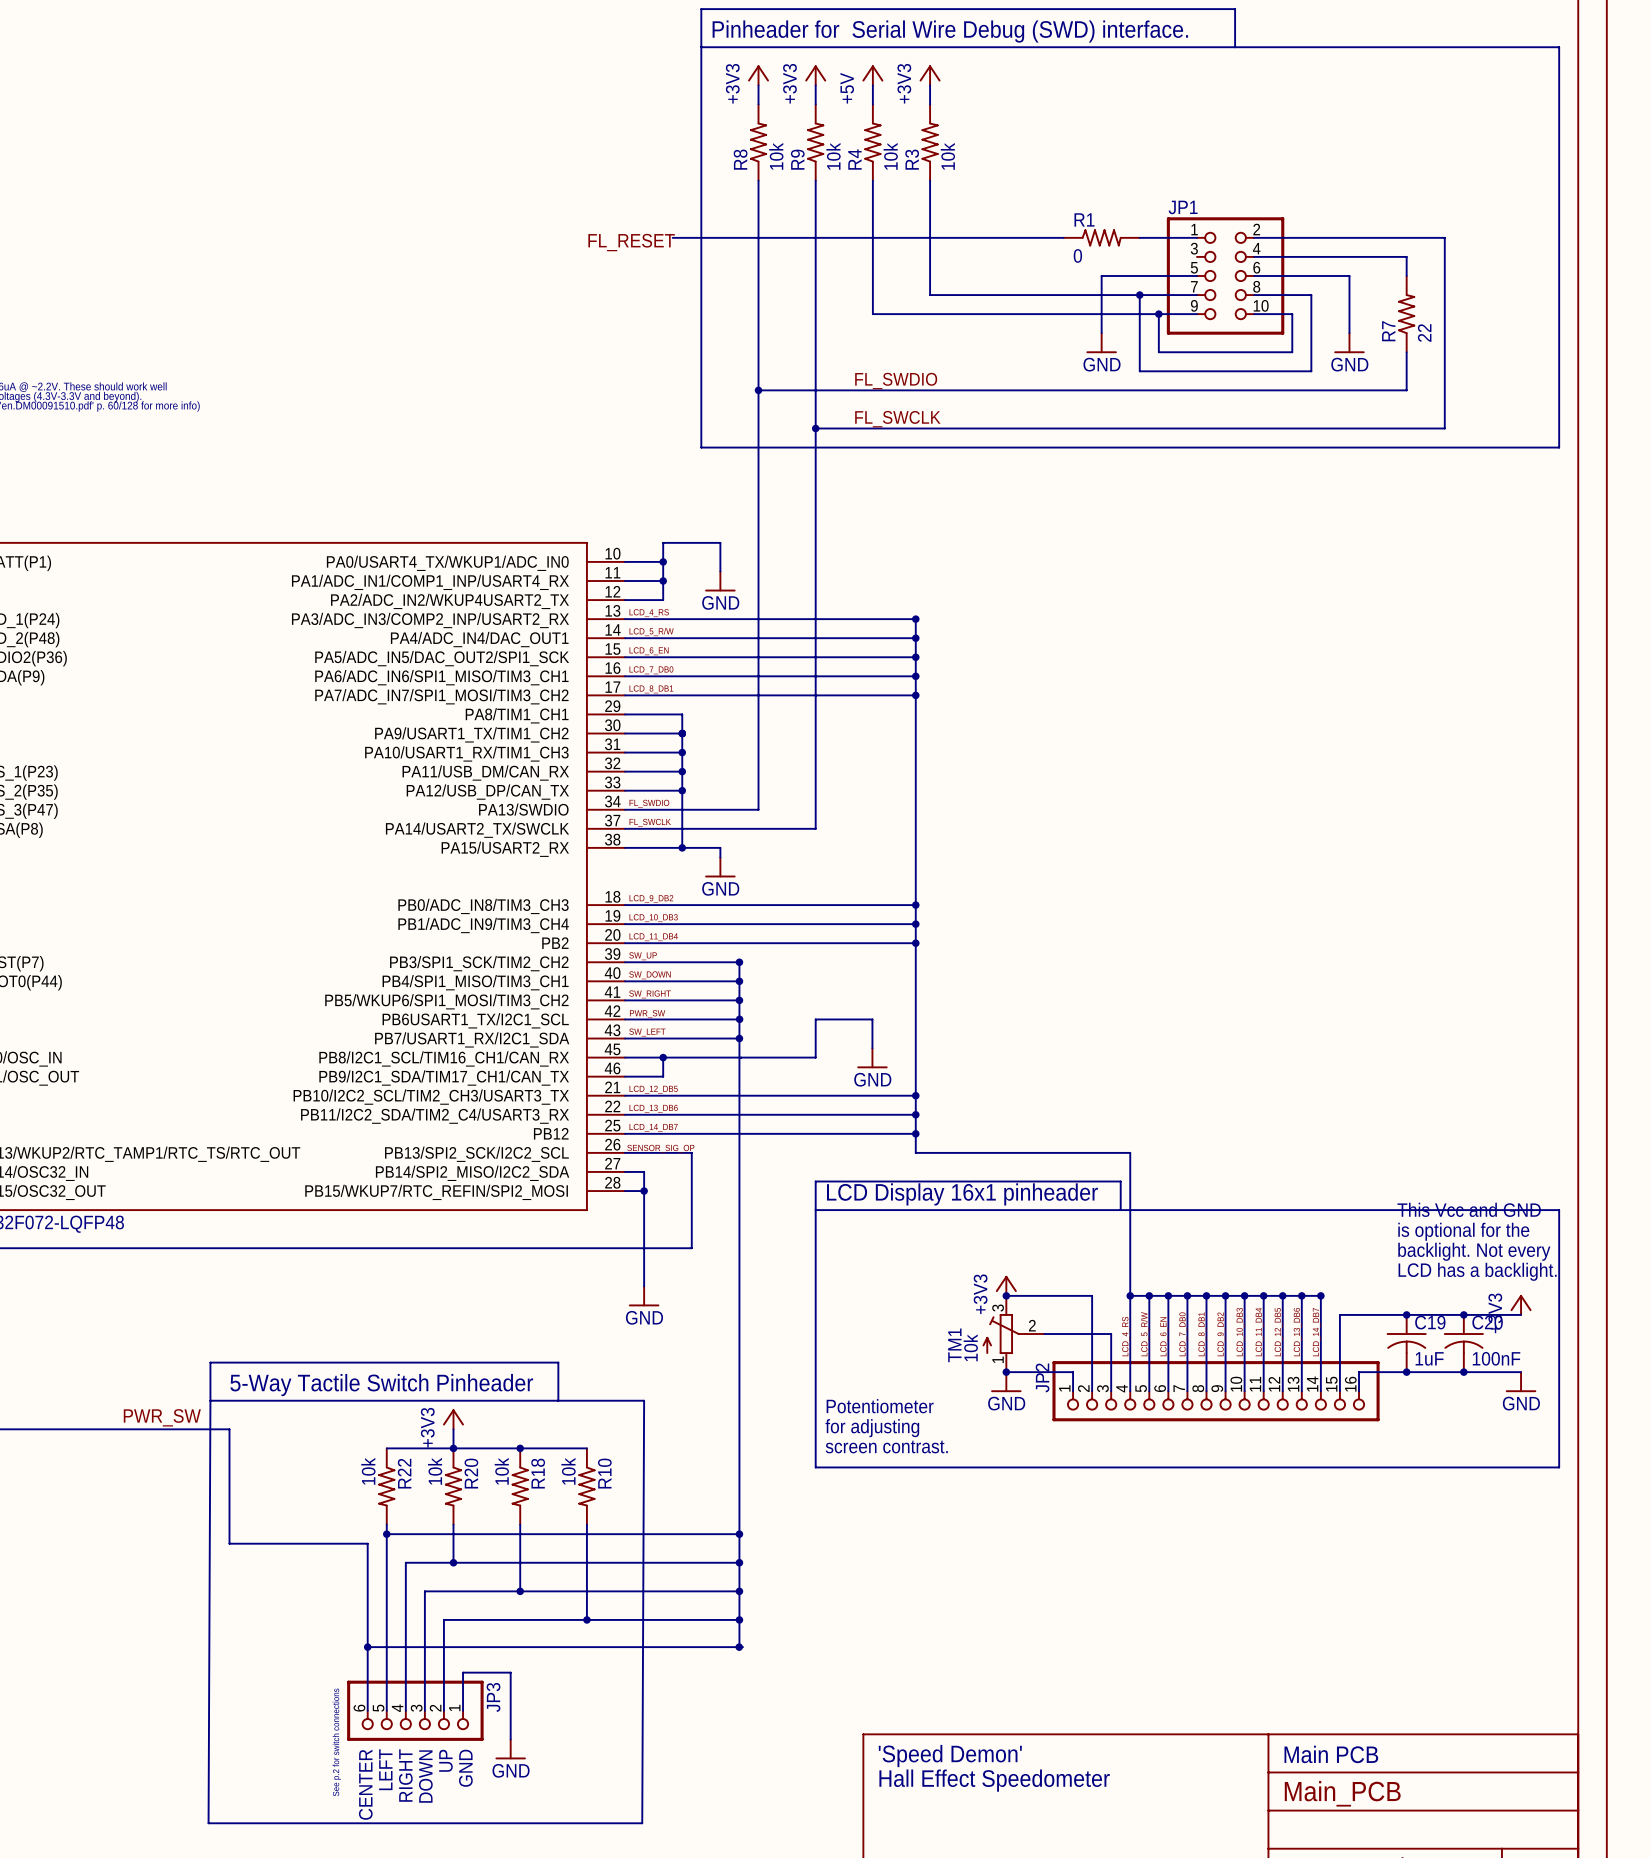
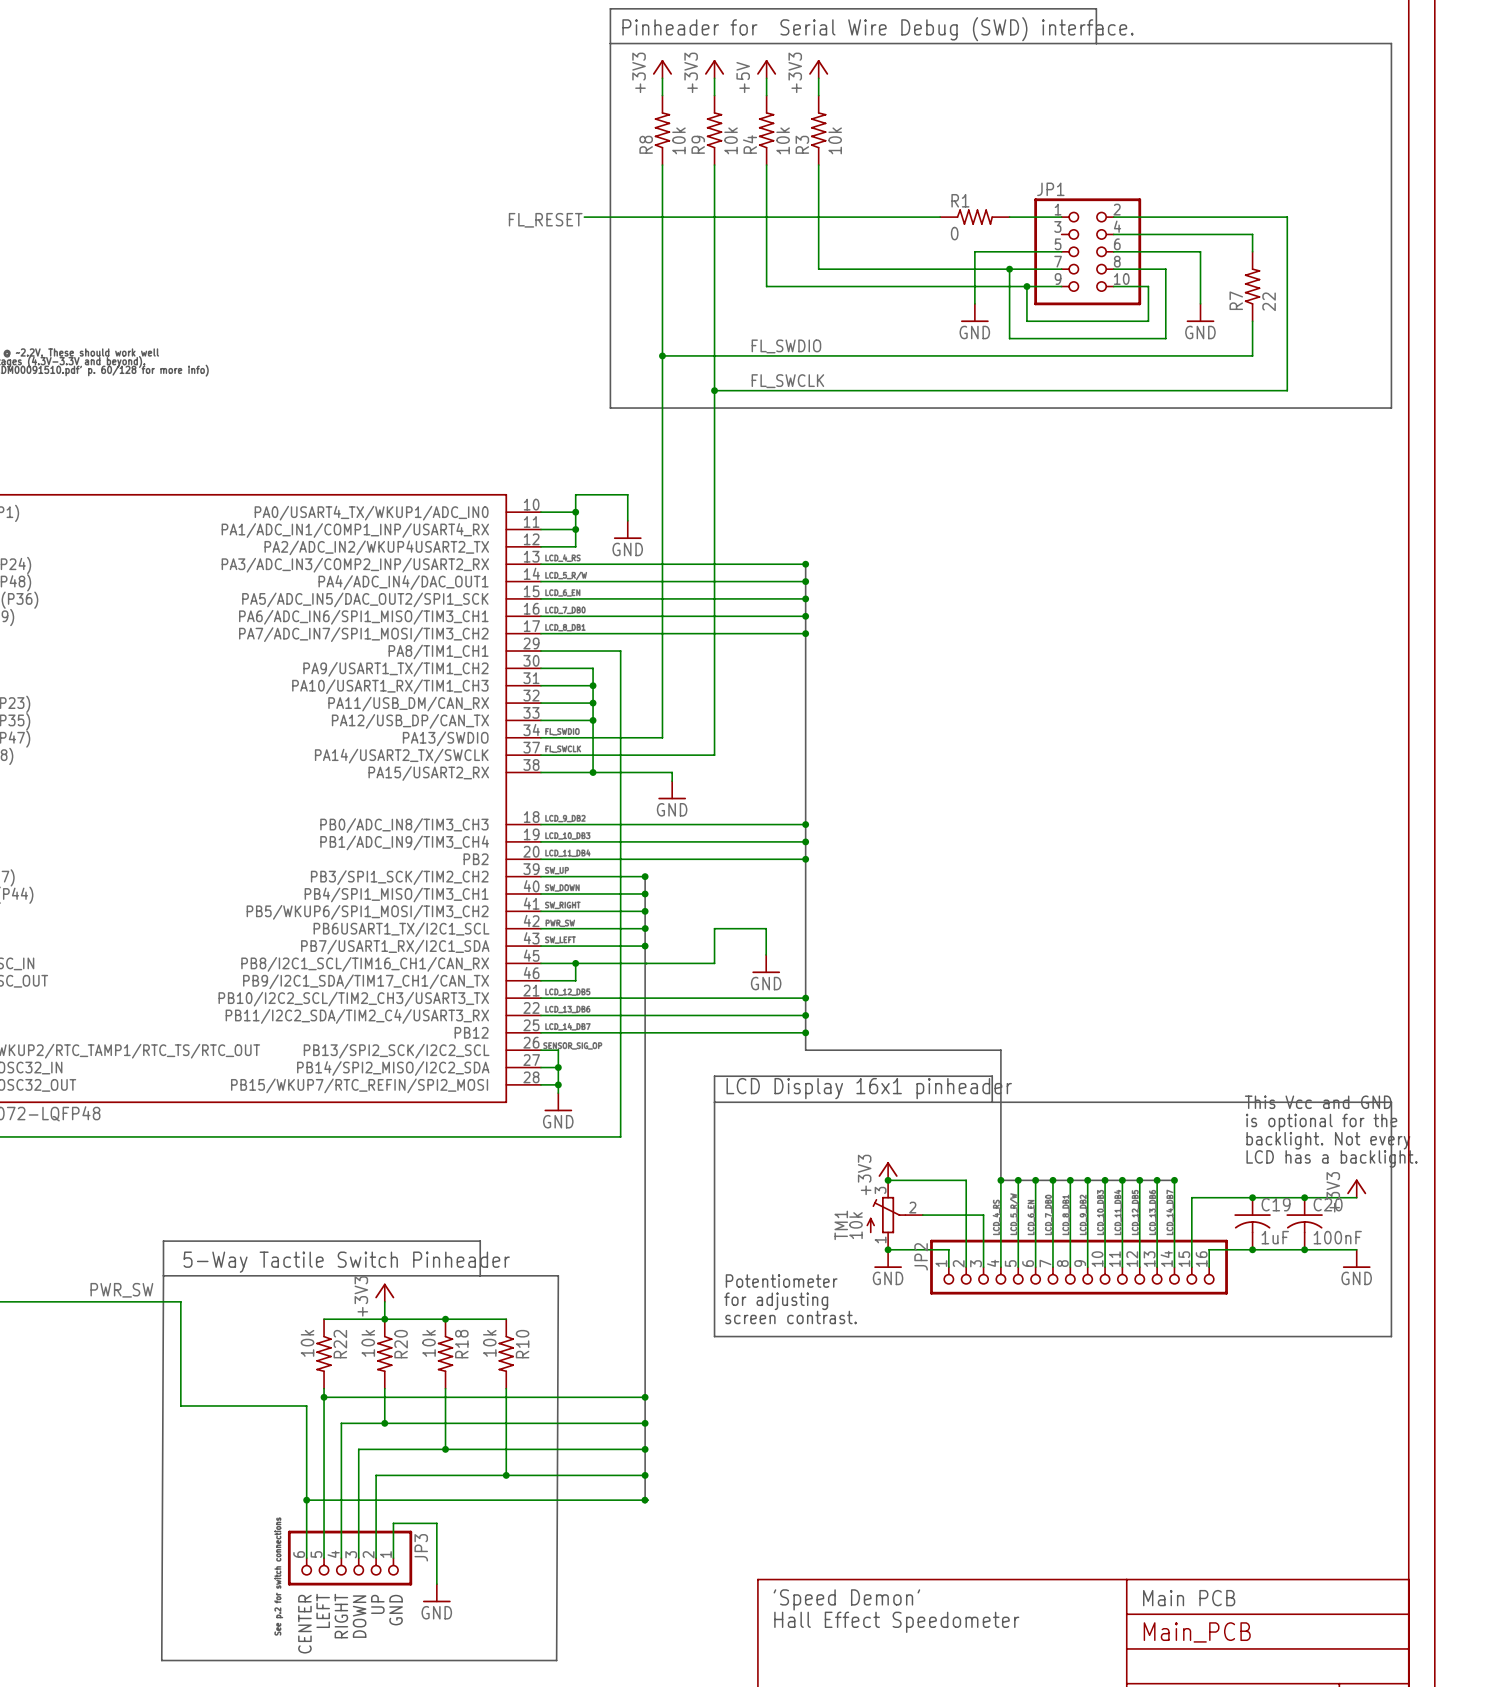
wire: (682, 714) (682, 733) -> (593, 651) (620, 651) (620, 1136) (601, 1136)
junction: (682, 733) -> none
wire: (720, 847) (720, 857) -> (627, 772) (672, 772) (672, 781)
power symbol position: GND (720, 867) -> GND (672, 790)
wire: (644, 1152) (691, 1152) (691, 1248) -> (558, 1050) (558, 1067)
junction: none -> (558, 1067)
wire: (644, 1200) (644, 1286) -> none
power symbol position: GND (644, 1296) -> GND (558, 1102)

